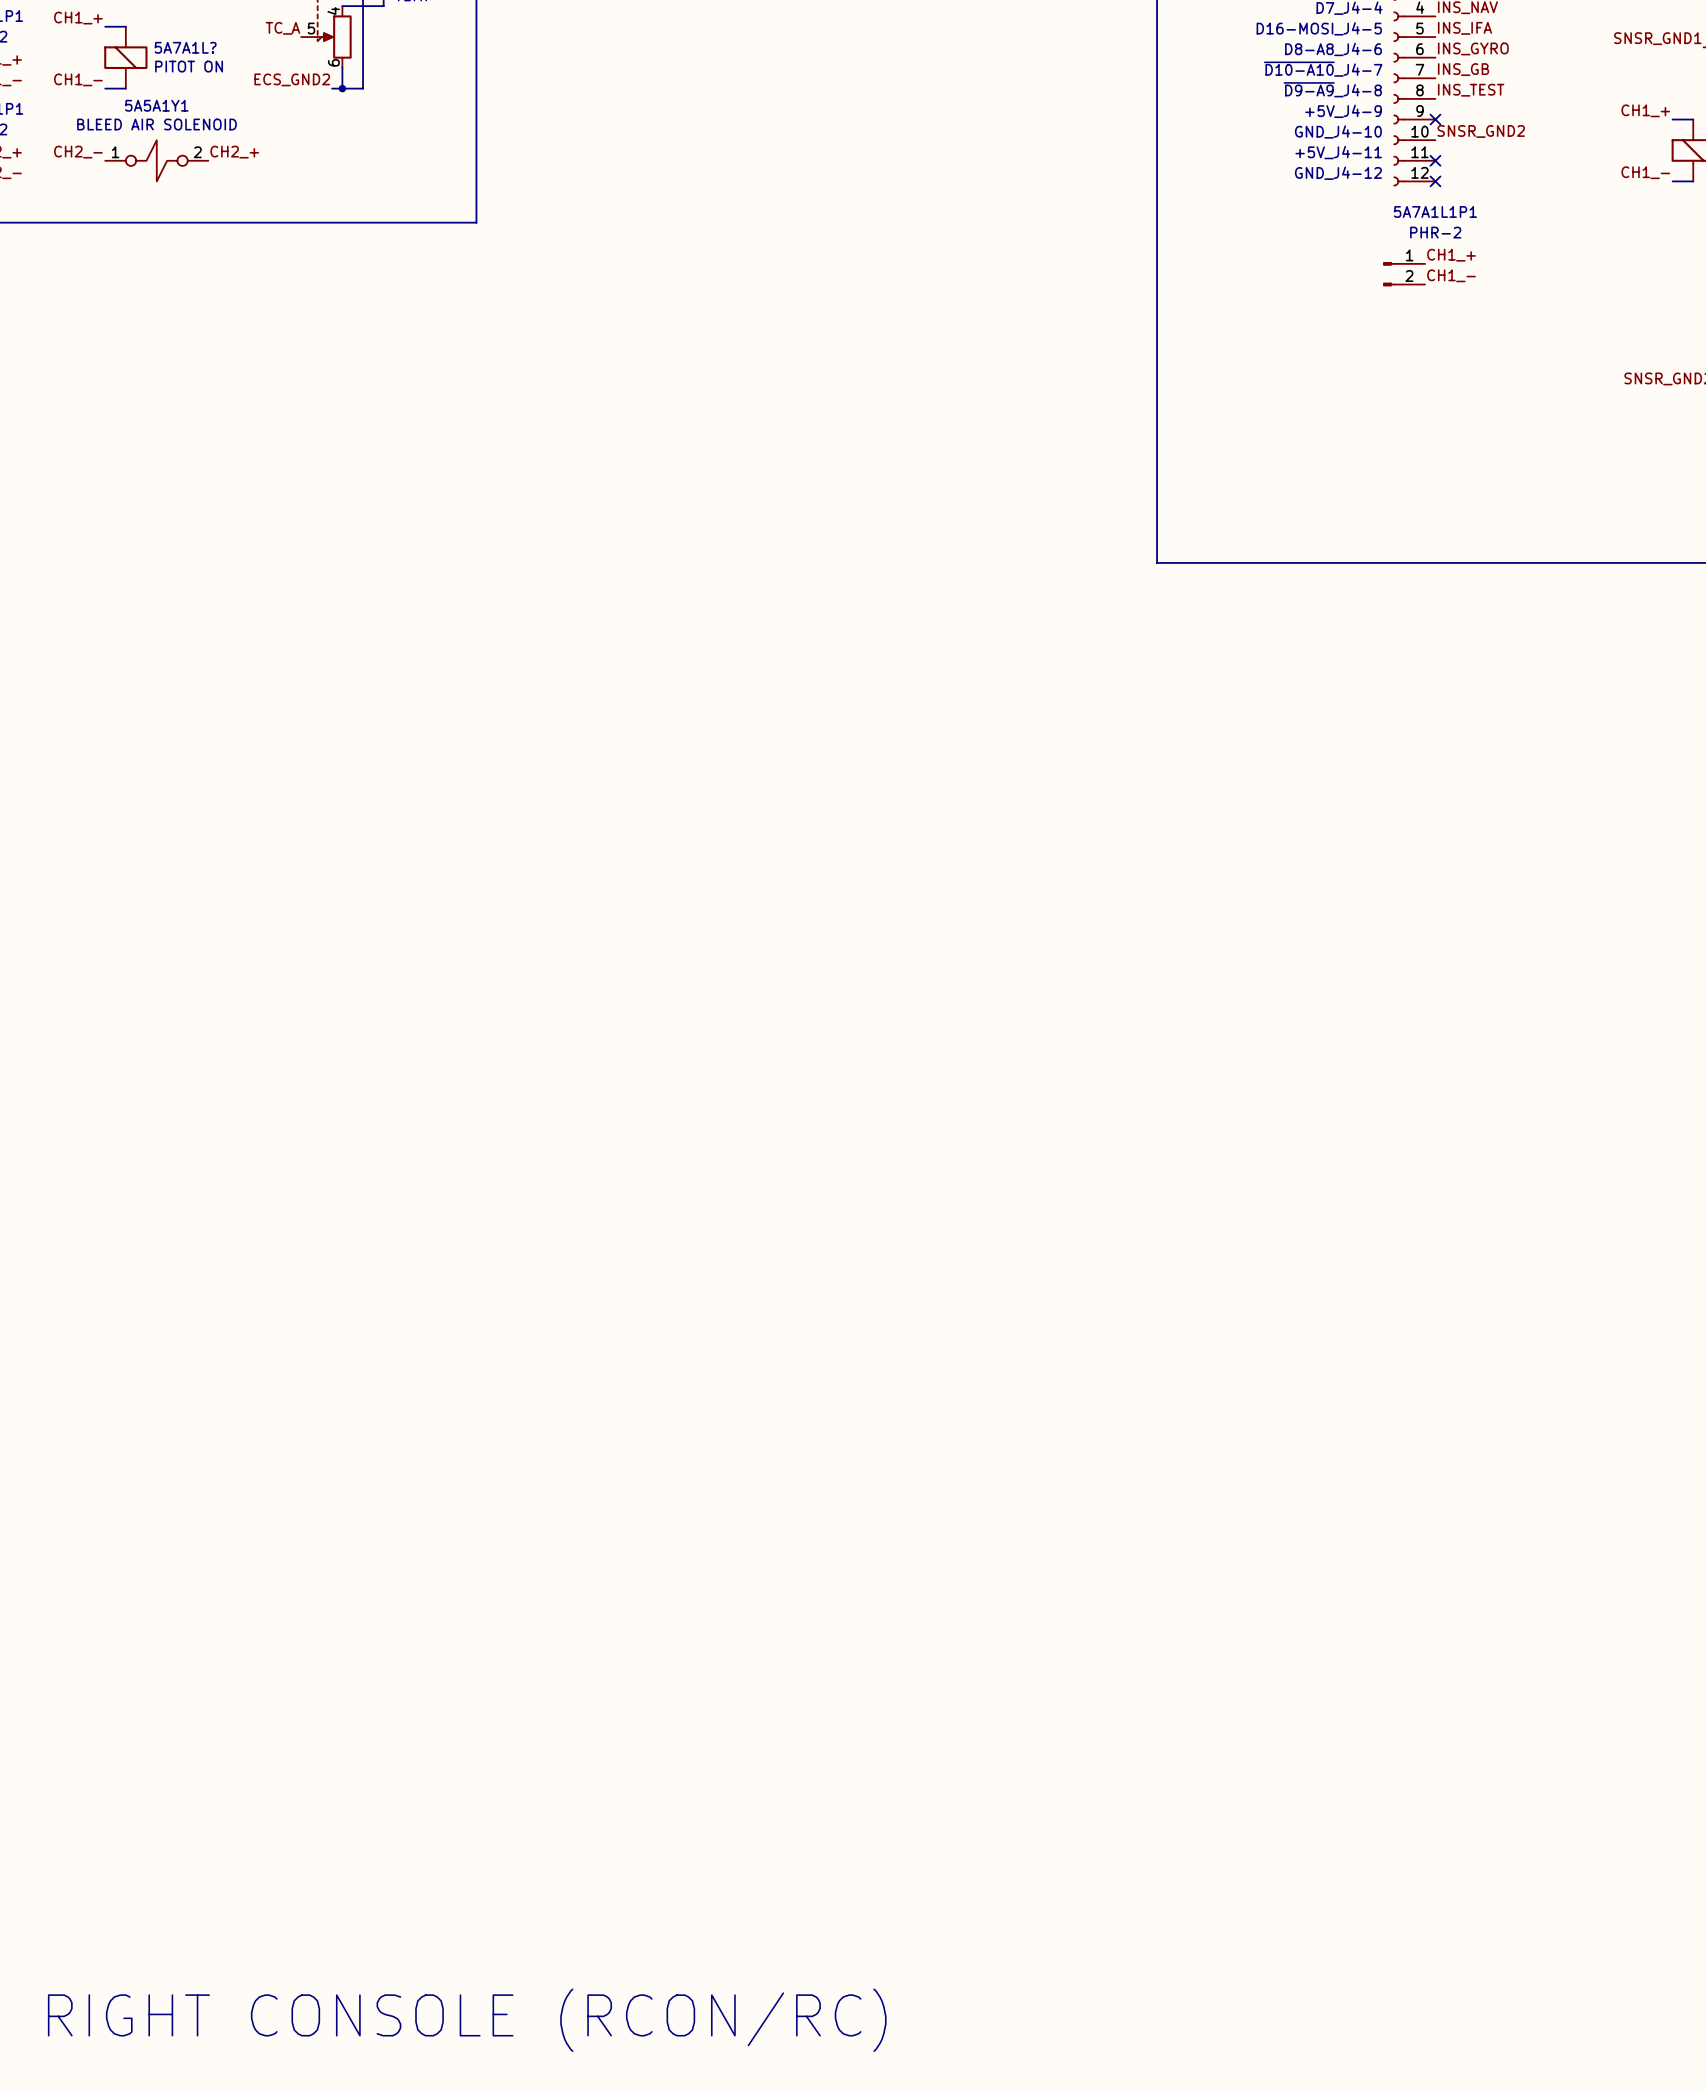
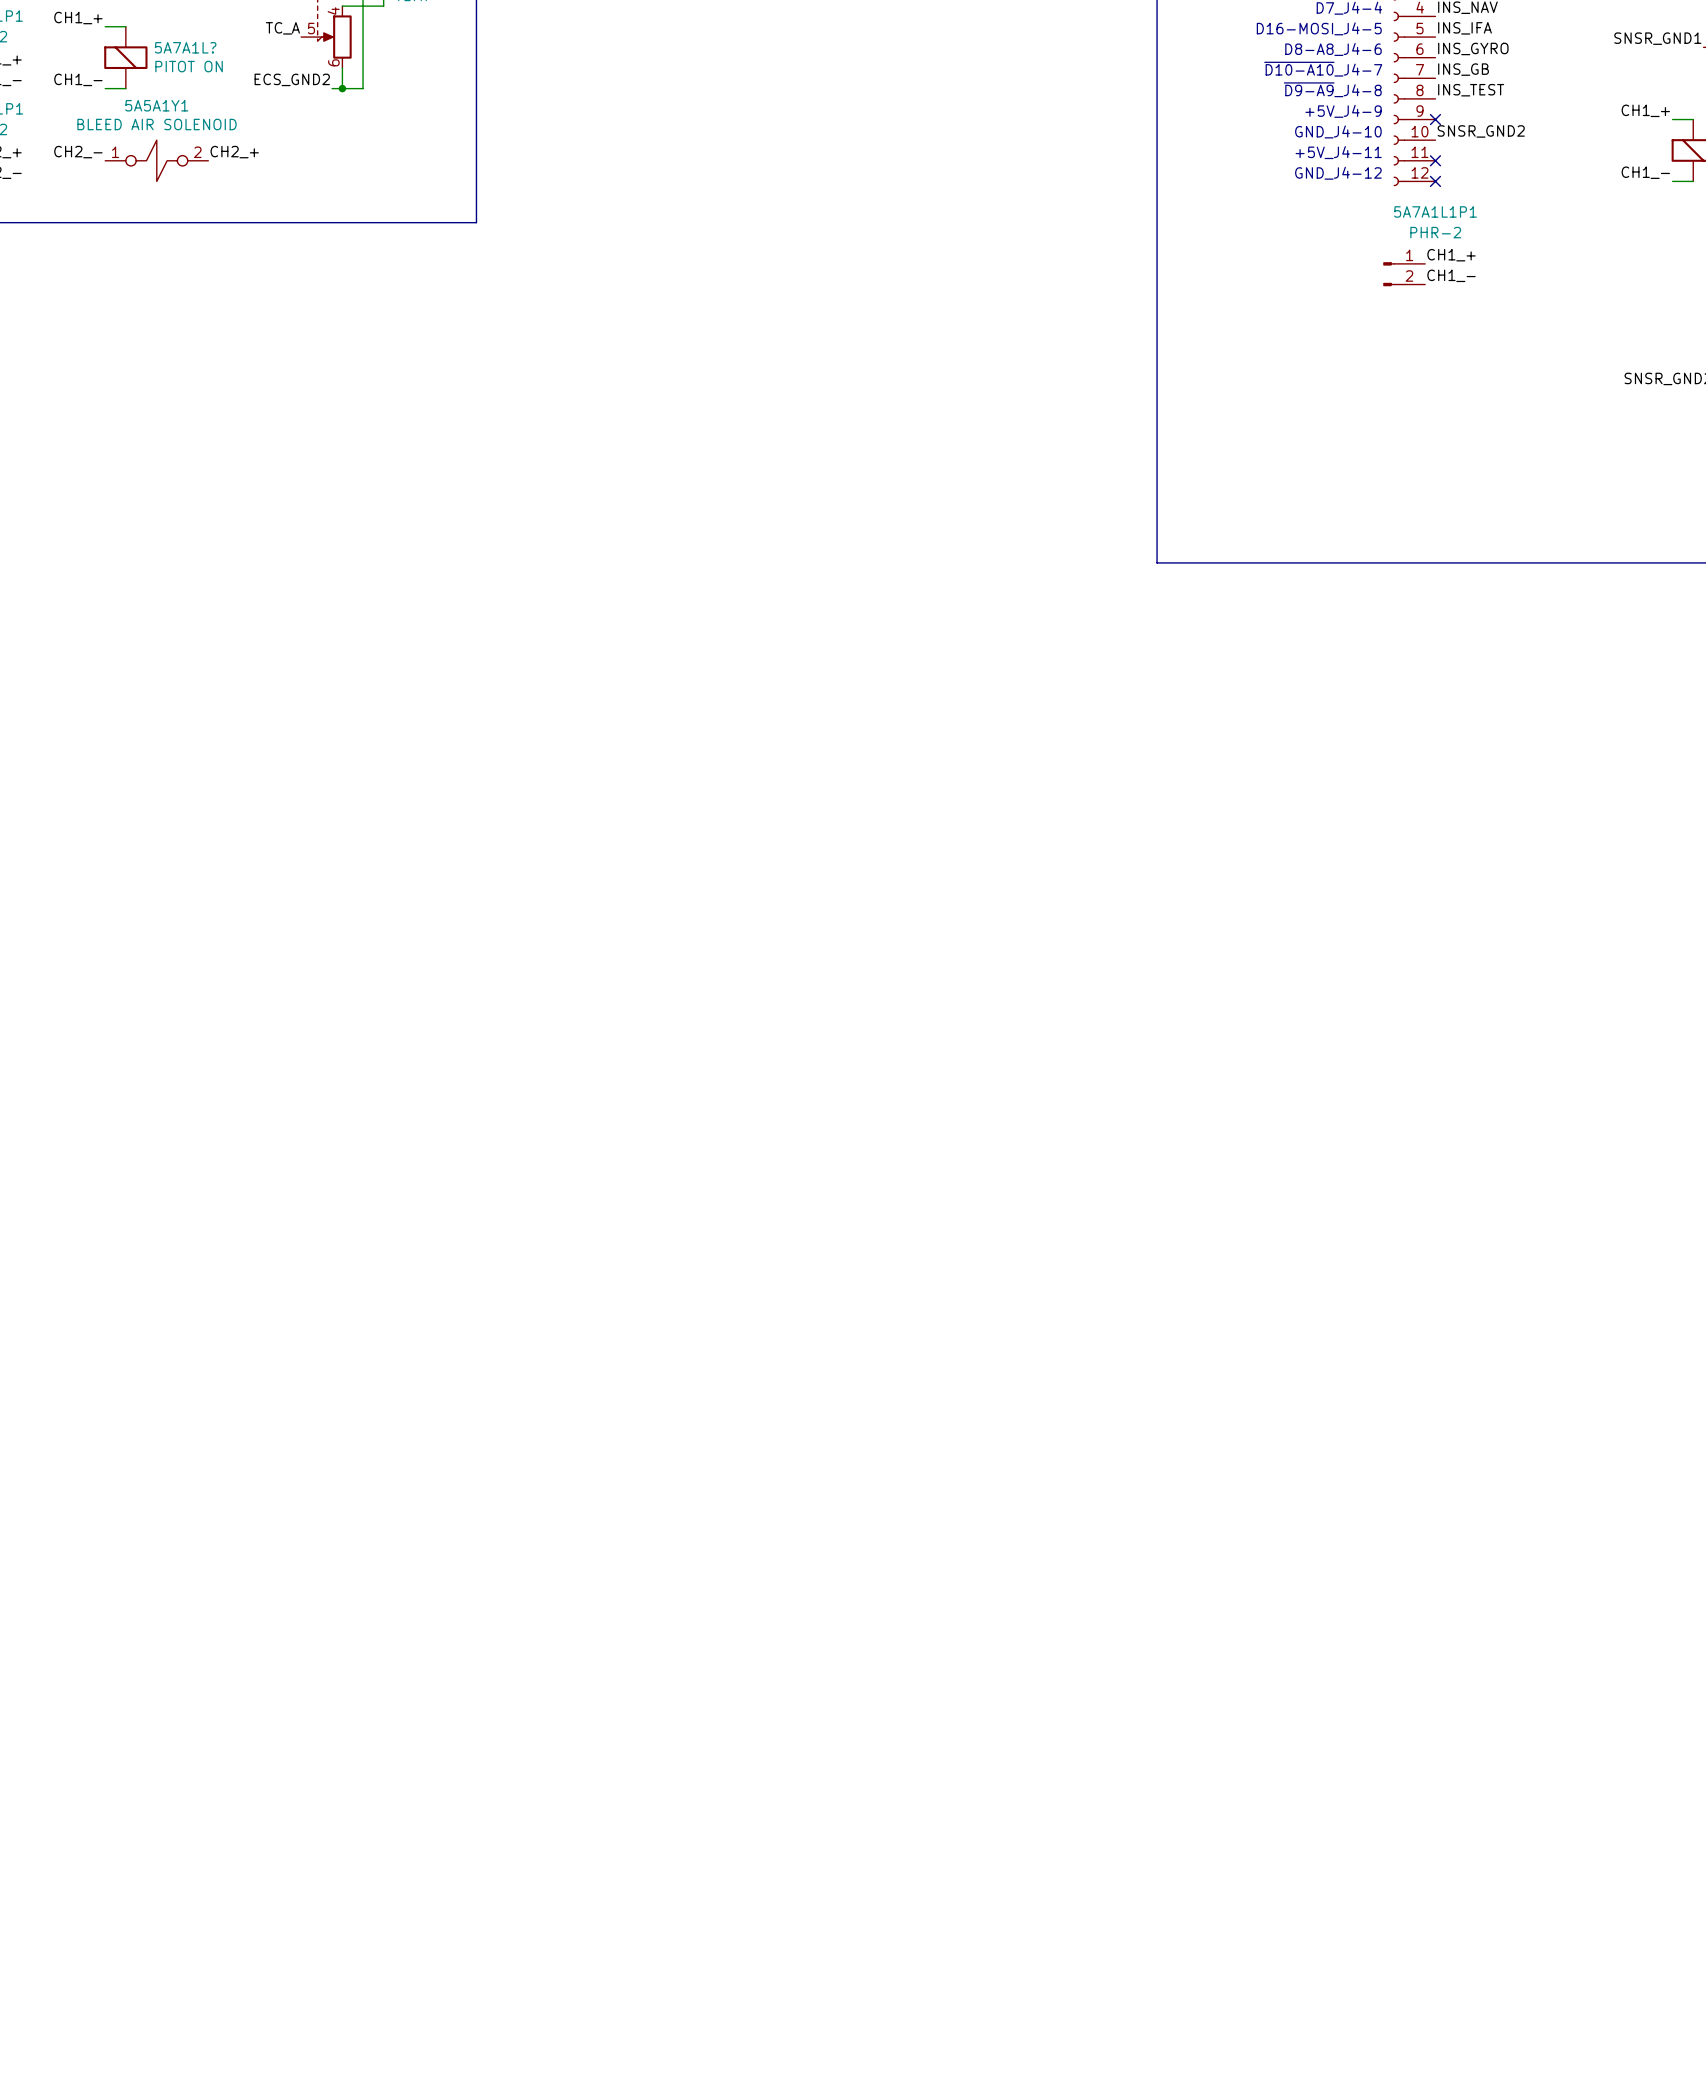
text: RIGHT CONSOLE (RCON/RC) (467, 2020) -> none

